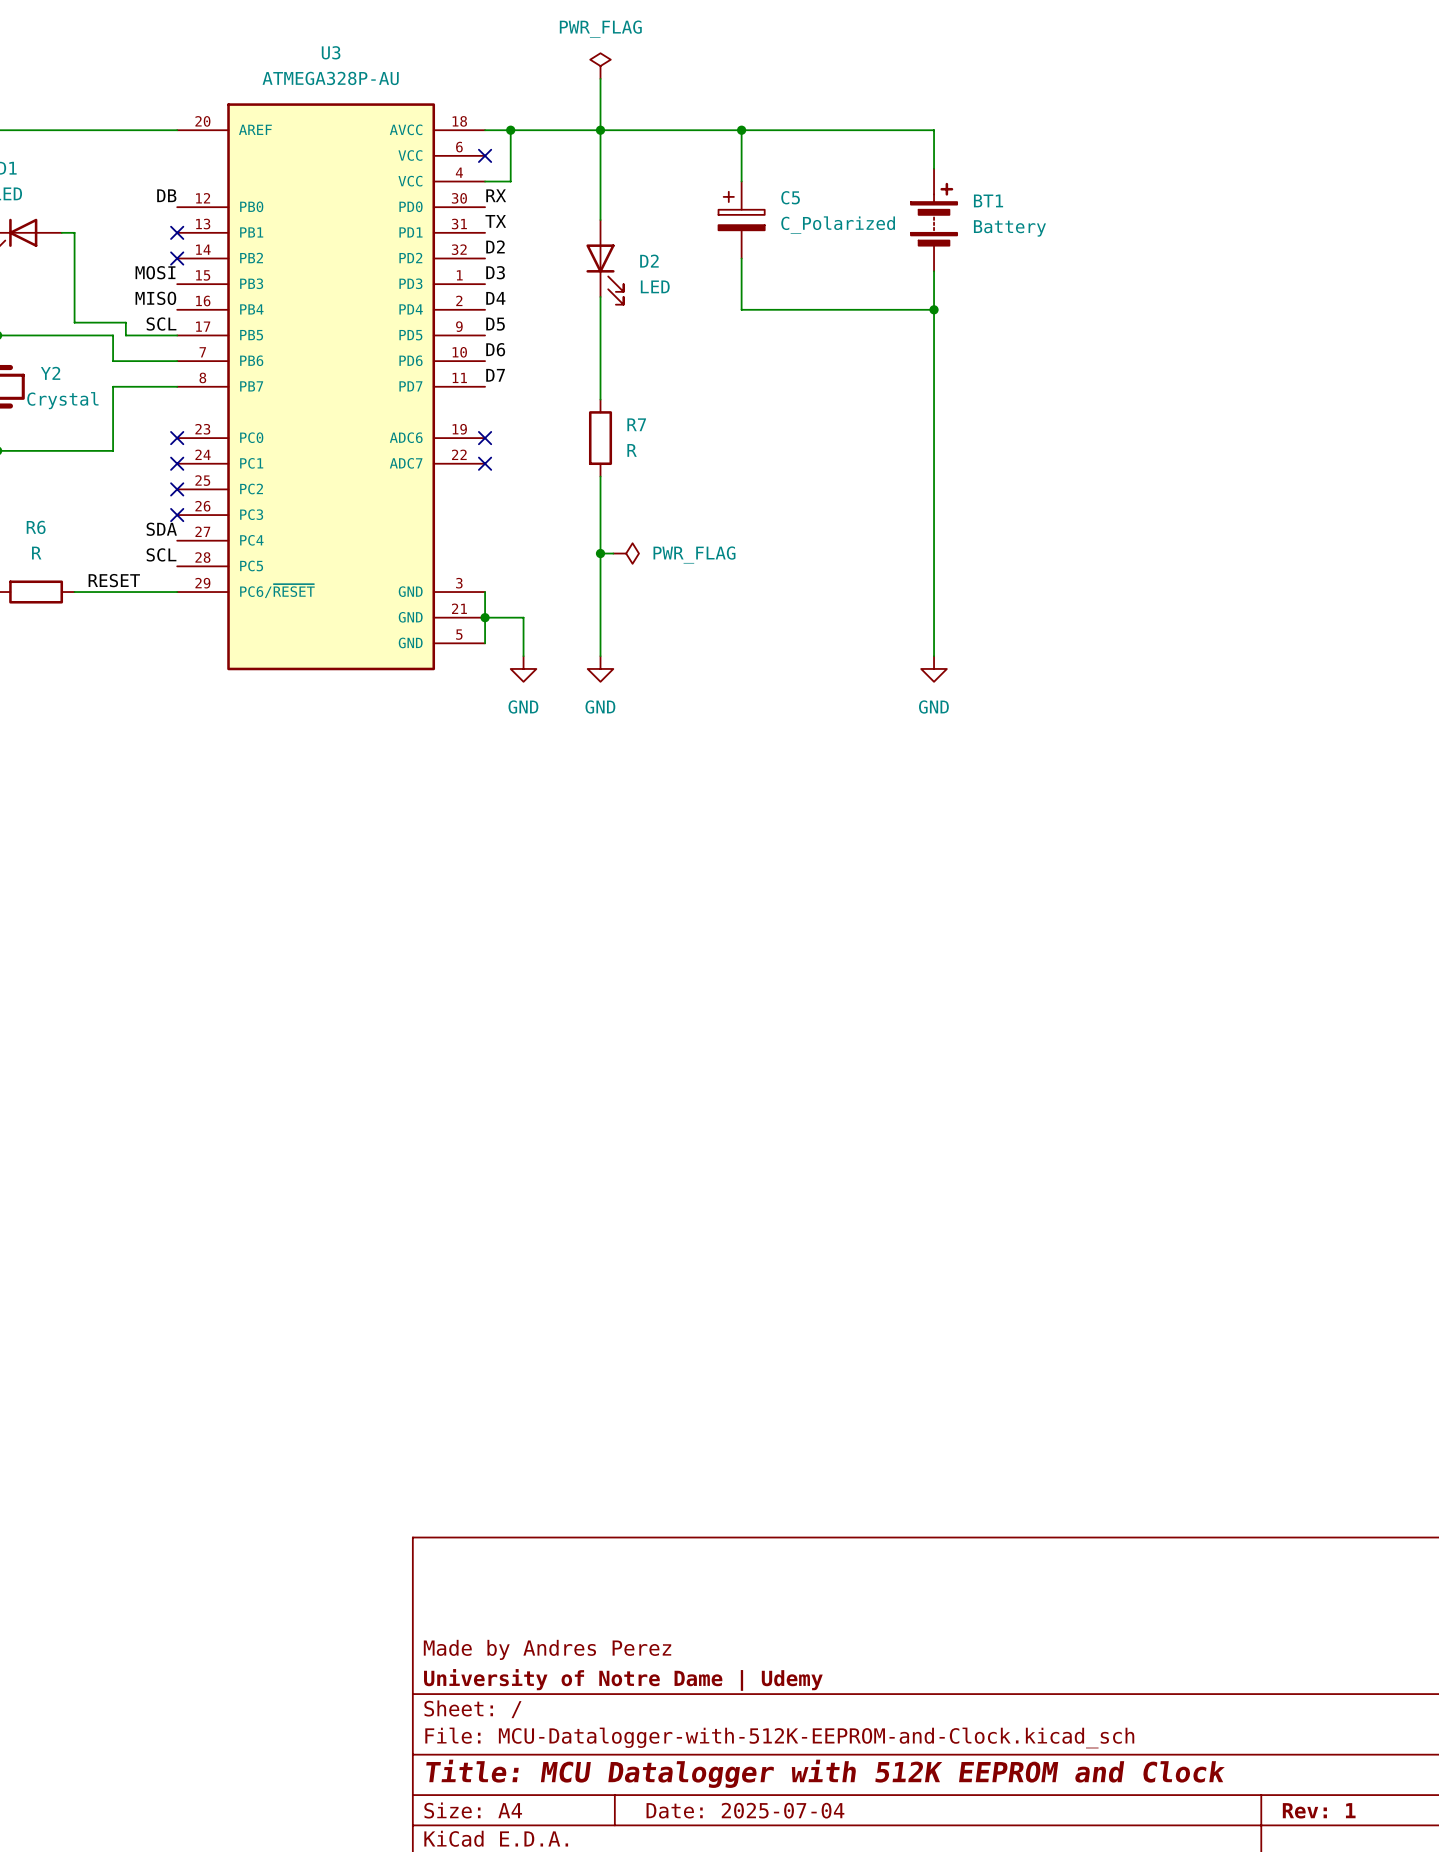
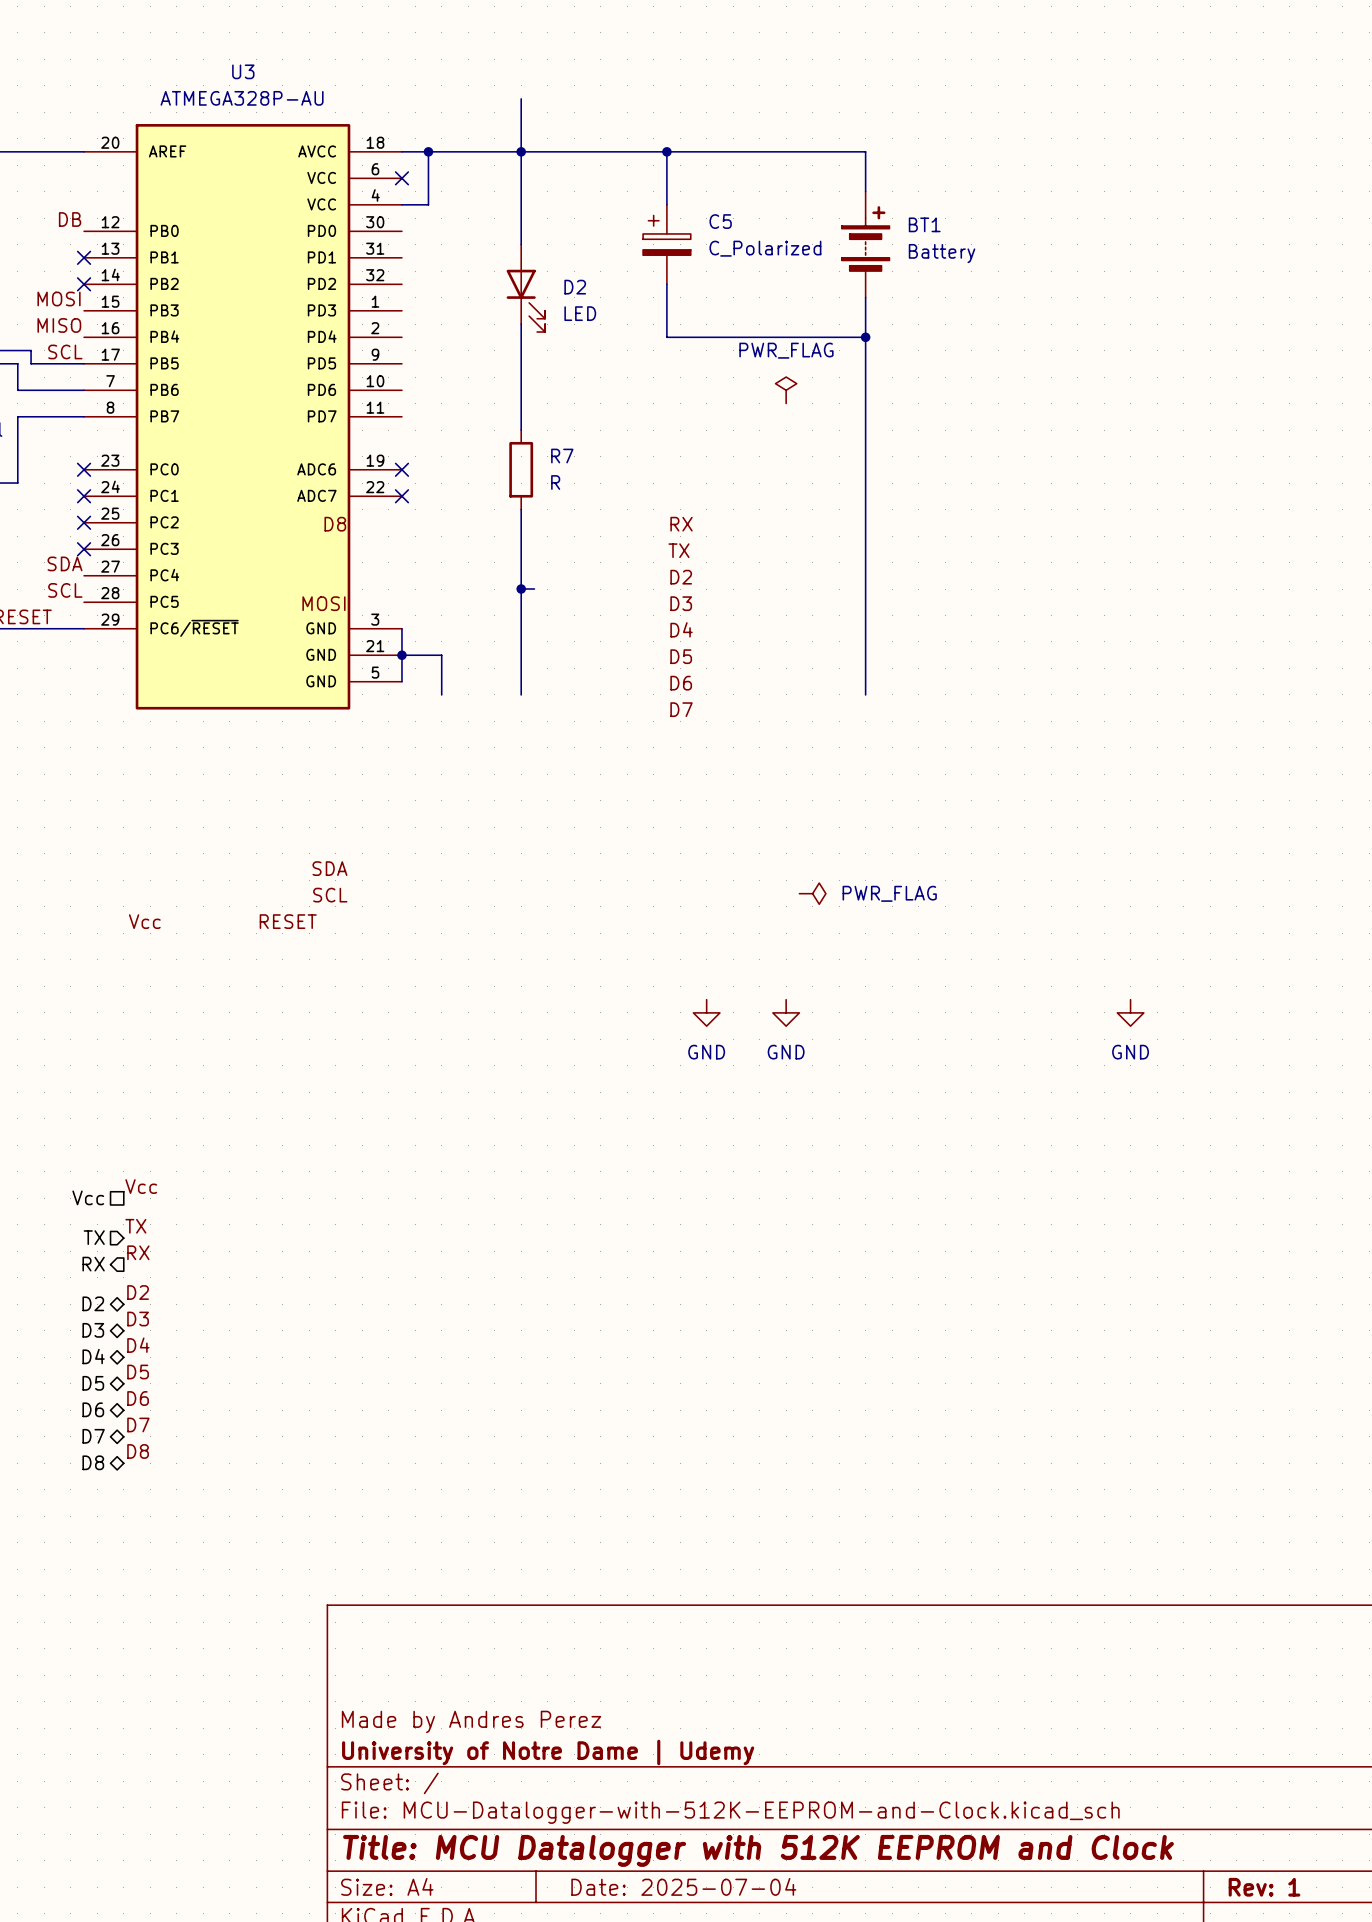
power symbol: PWR_FLAG (600, 66) -> none
label: RX (496, 195) -> none
label: TX (495, 221) -> none
label: D2 (495, 246) -> none
label: D3 (495, 272) -> none
label: D4 (495, 298) -> none
label: D5 (495, 324) -> none
label: D6 (495, 349) -> none
power symbol: none -> PWR_FLAG (786, 390)
label: D7 (495, 375) -> none
label: none -> D8 (335, 524)
label: none -> RX (681, 524)
label: none -> TX (679, 550)
label: none -> D2 (681, 577)
power symbol: PWR_FLAG (626, 553) -> none
label: none -> MOSI (323, 603)
label: none -> D3 (681, 603)
label: none -> D4 (681, 629)
label: none -> D5 (681, 656)
label: none -> D6 (681, 683)
power symbol: GND (523, 668) -> none
power symbol: GND (600, 668) -> none
power symbol: GND (934, 668) -> none
label: none -> D7 (681, 709)
label: none -> SDA (329, 868)
power symbol: none -> PWR_FLAG (812, 893)
label: none -> SCL (330, 895)
label: none -> Vcc (144, 921)
label: none -> RESET (288, 921)
power symbol: none -> GND (706, 1012)
power symbol: none -> GND (786, 1012)
power symbol: none -> GND (1130, 1012)
label: none -> Vcc (141, 1186)
sheet pin: none -> Vcc (88, 1197)
label: none -> TX (135, 1226)
sheet pin: none -> TX (94, 1237)
label: none -> RX (138, 1252)
sheet pin: none -> RX (93, 1264)
label: none -> D2 (138, 1292)
sheet pin: none -> D2 (93, 1303)
label: none -> D3 (138, 1319)
sheet pin: none -> D3 (93, 1330)
label: none -> D4 (138, 1345)
sheet pin: none -> D4 (93, 1356)
label: none -> D5 (138, 1372)
sheet pin: none -> D5 (93, 1383)
label: none -> D6 (138, 1398)
sheet pin: none -> D6 (93, 1409)
label: none -> D7 (138, 1424)
sheet pin: none -> D7 (93, 1436)
label: none -> D8 (138, 1451)
sheet pin: none -> D8 (93, 1462)

